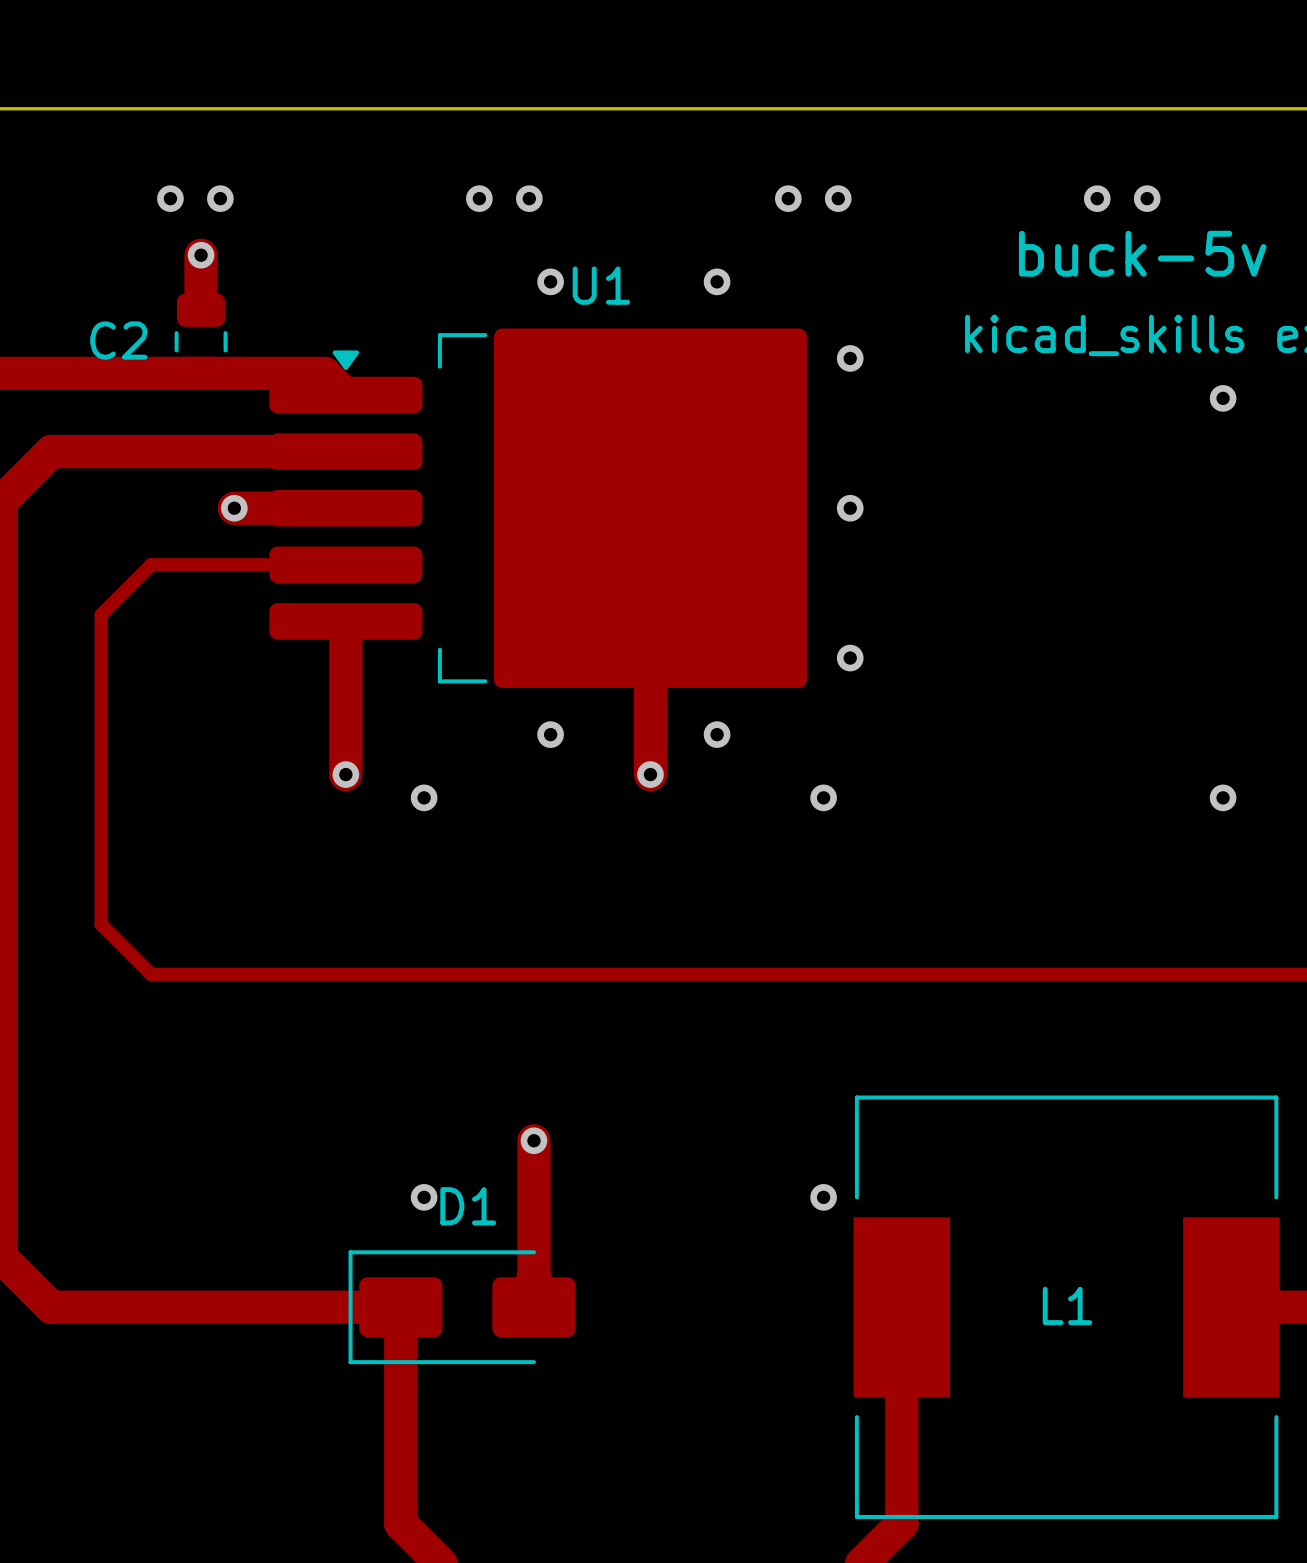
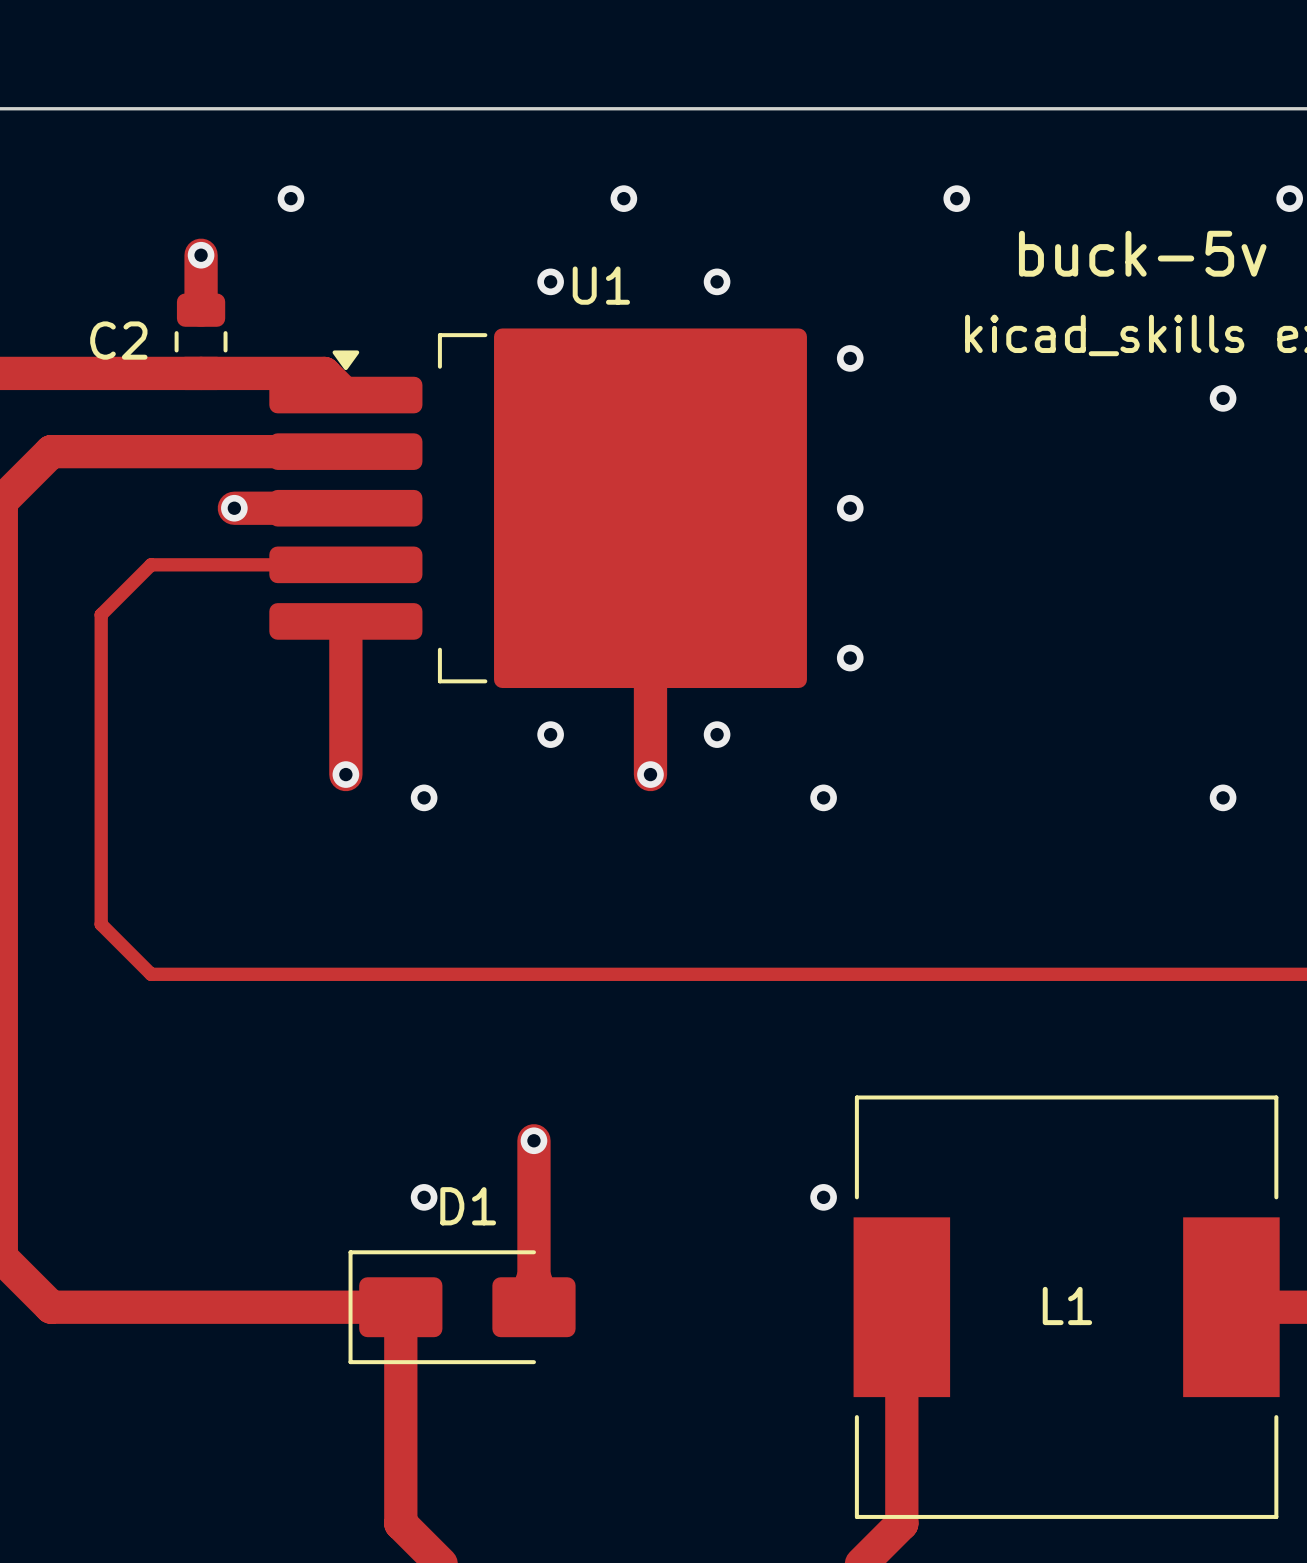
via: (170, 198) -> none
via: (220, 198) -> none
via: none -> (290, 198)
via: (479, 198) -> none
via: (529, 198) -> none
via: none -> (623, 198)
via: (788, 198) -> none
via: (838, 198) -> none
via: none -> (956, 198)
via: (1097, 198) -> none
via: (1147, 198) -> none
via: none -> (1289, 198)

